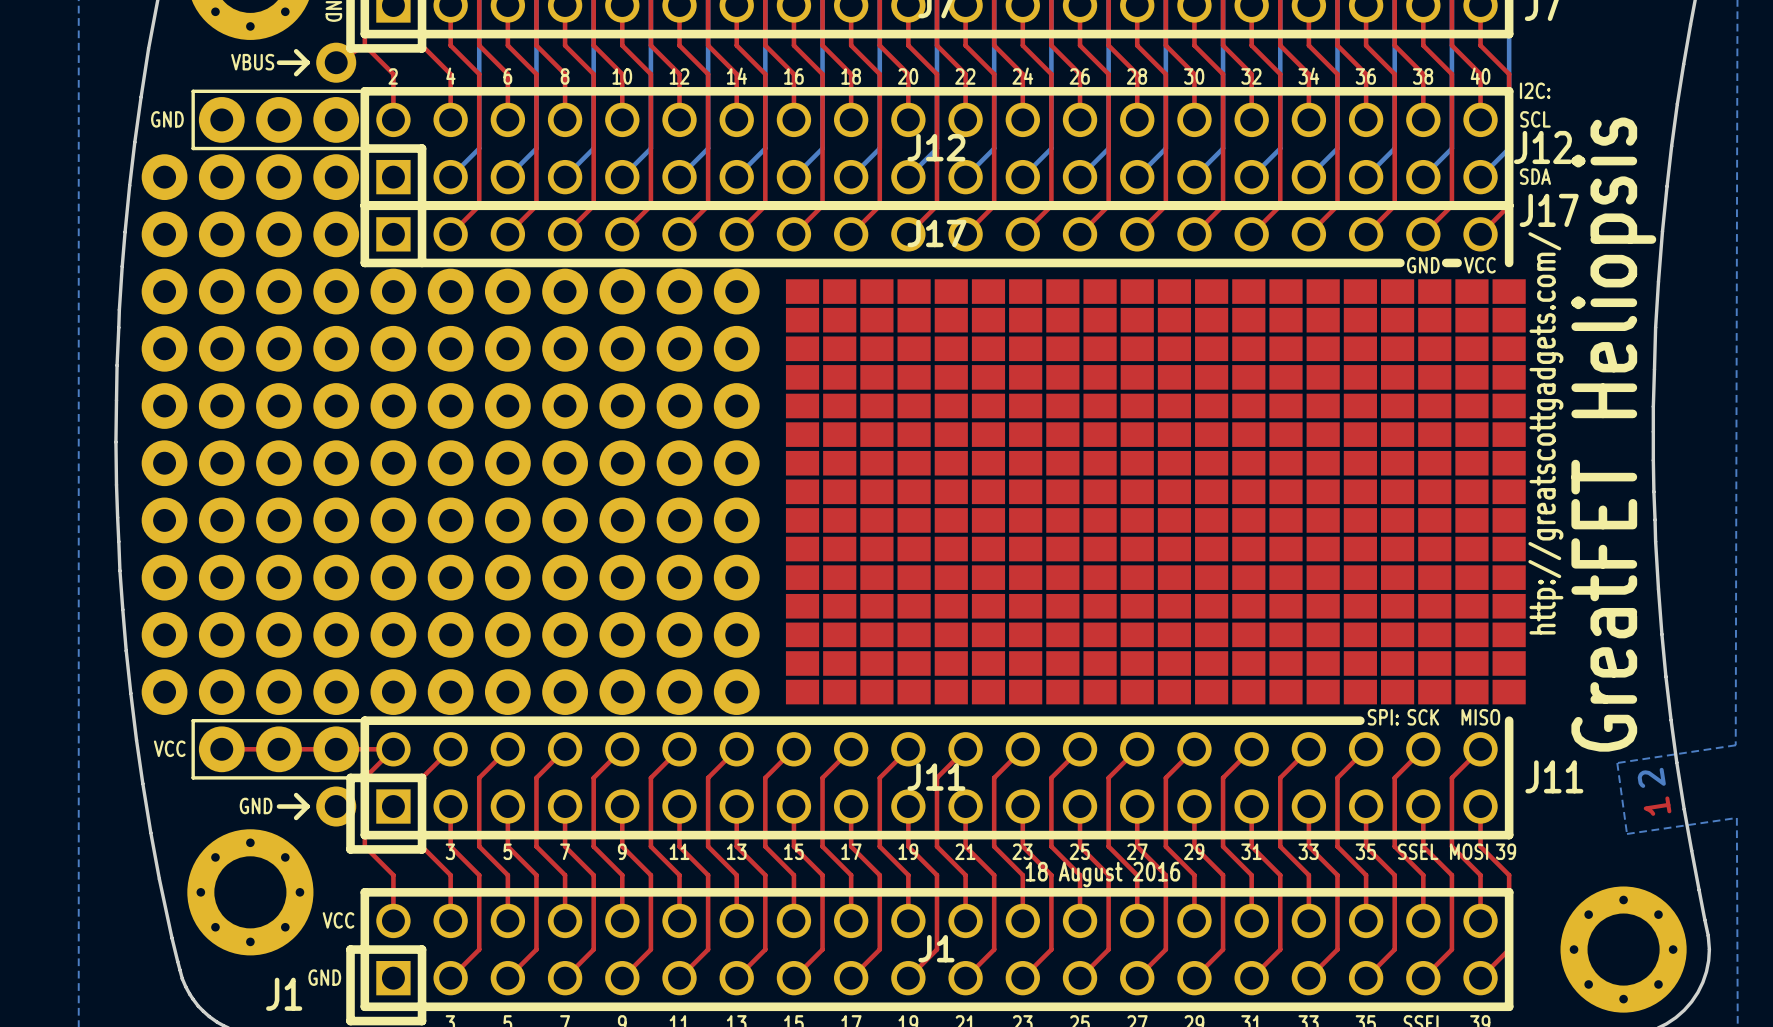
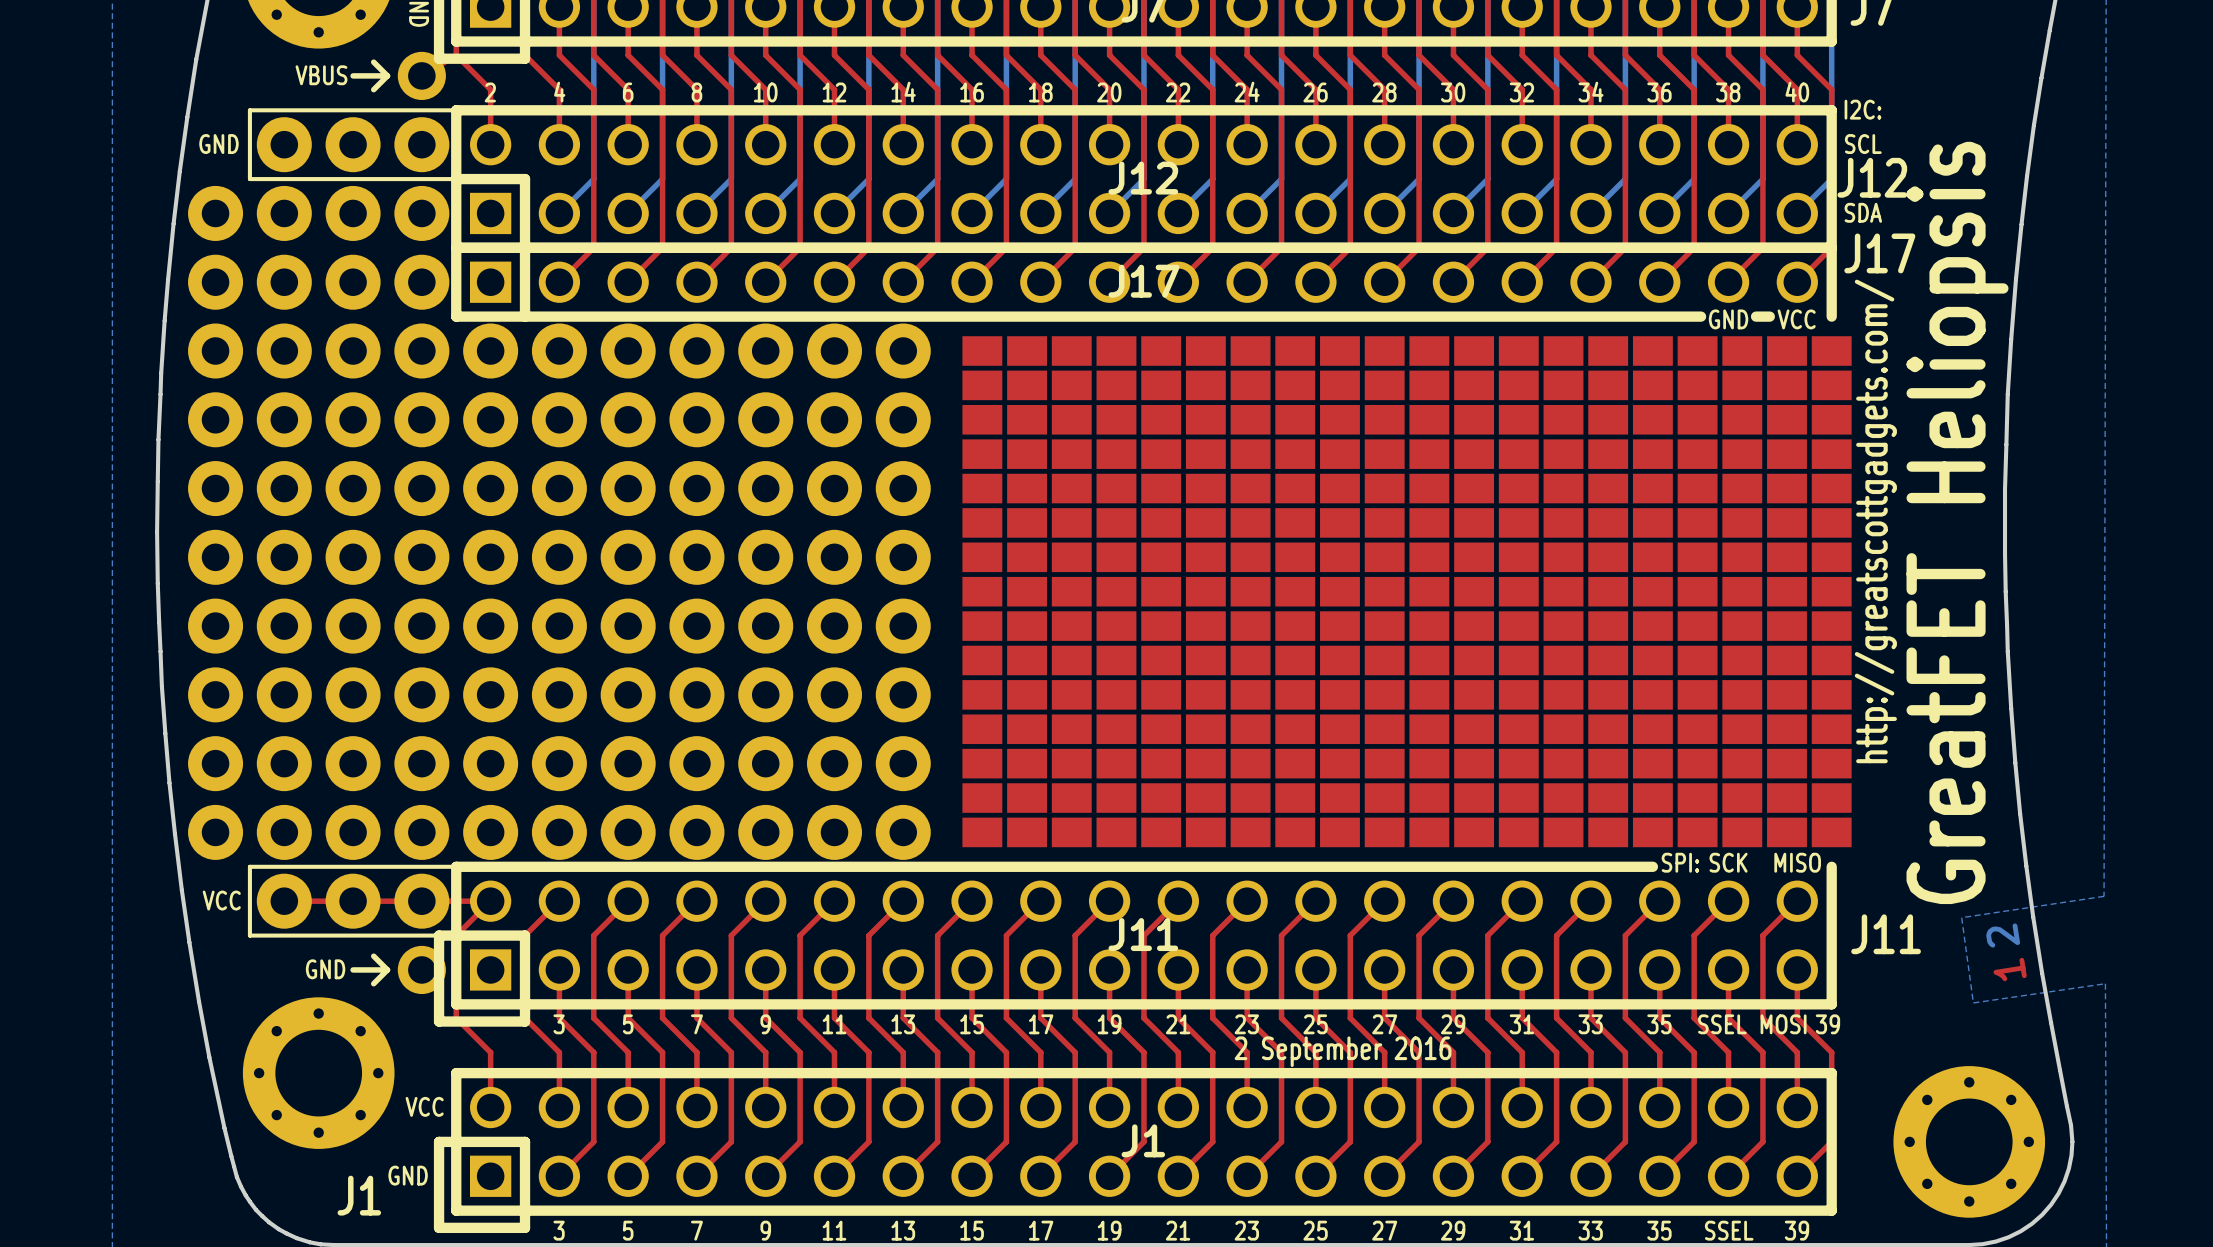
text: 18 August 2016 (1102, 874) -> 2 September 2016 (1343, 1051)

